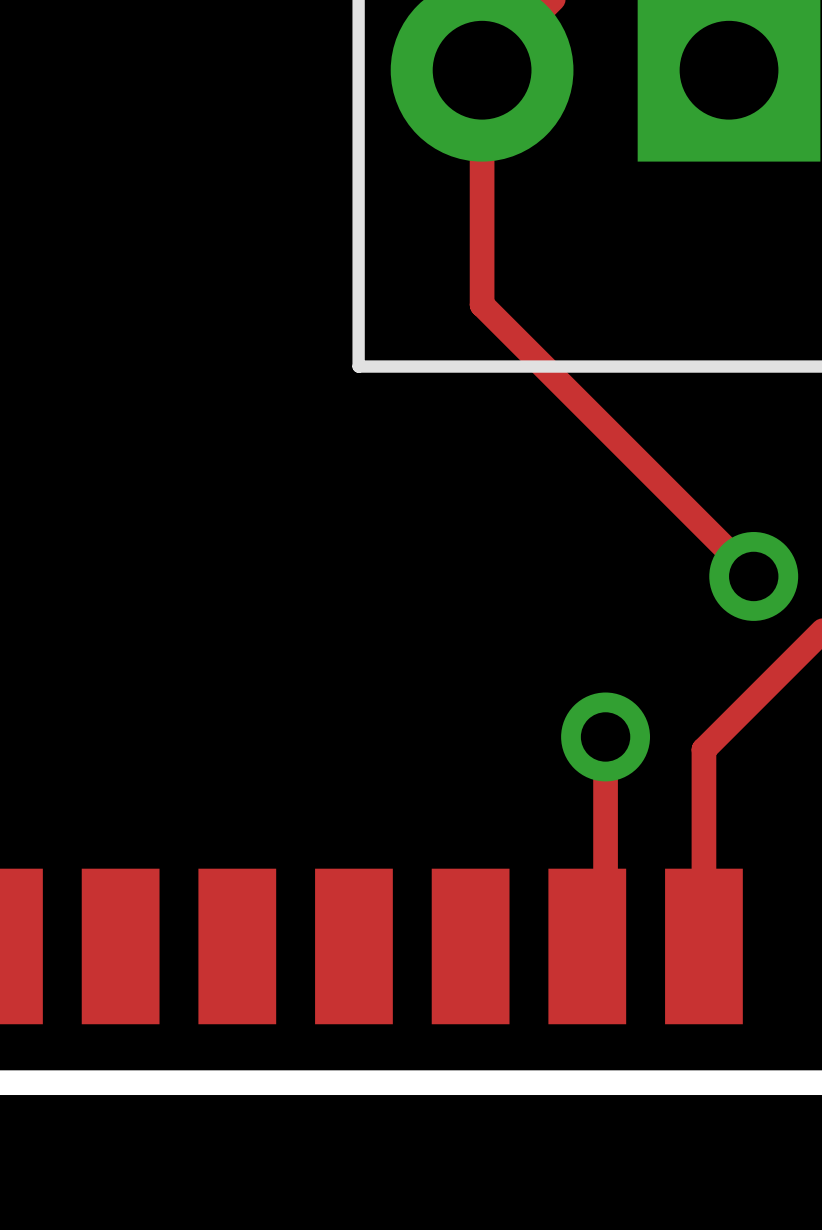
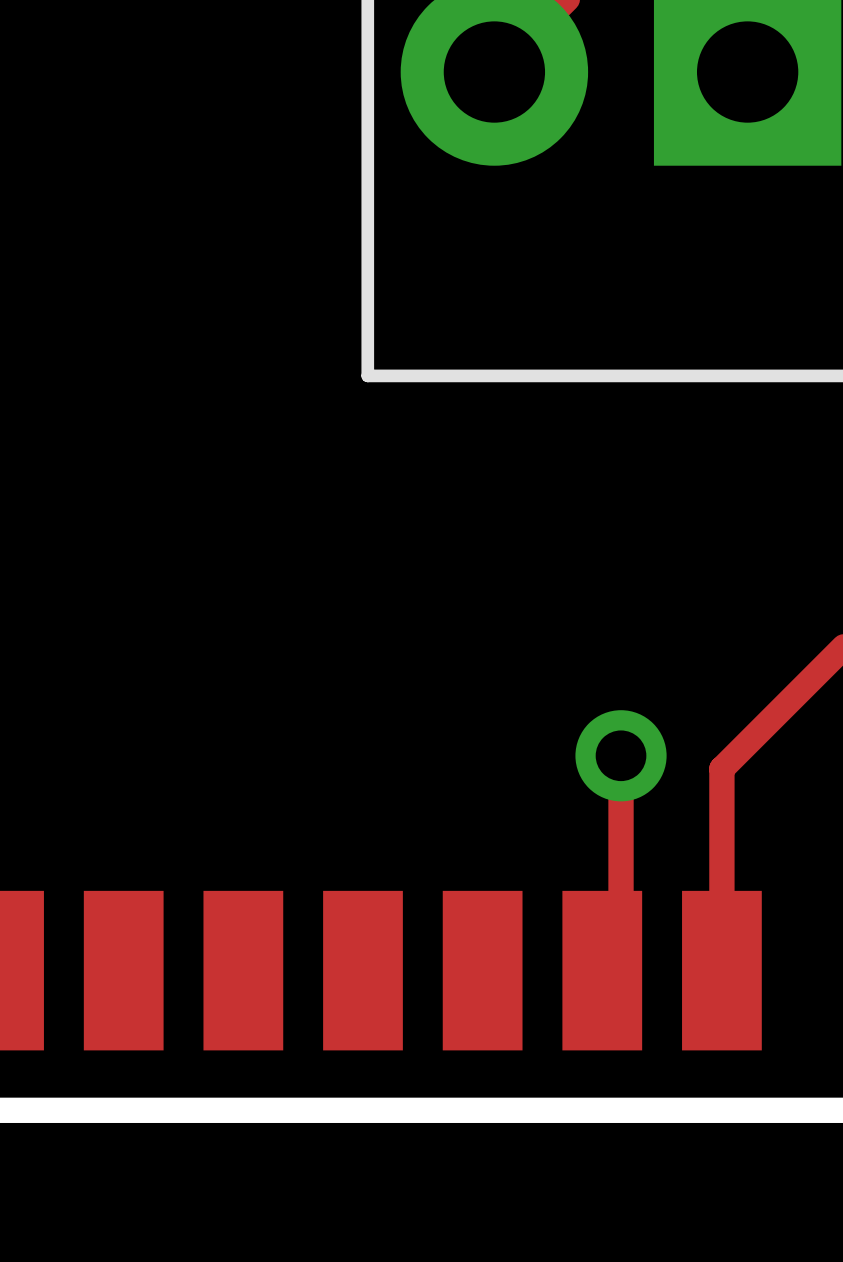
track: (482, 70) (482, 304) (753, 576) -> none
via: (753, 576) -> none

